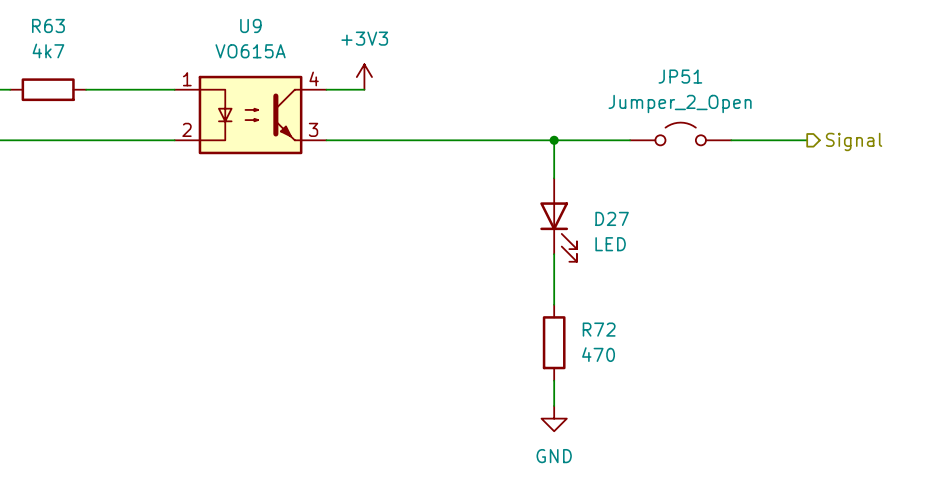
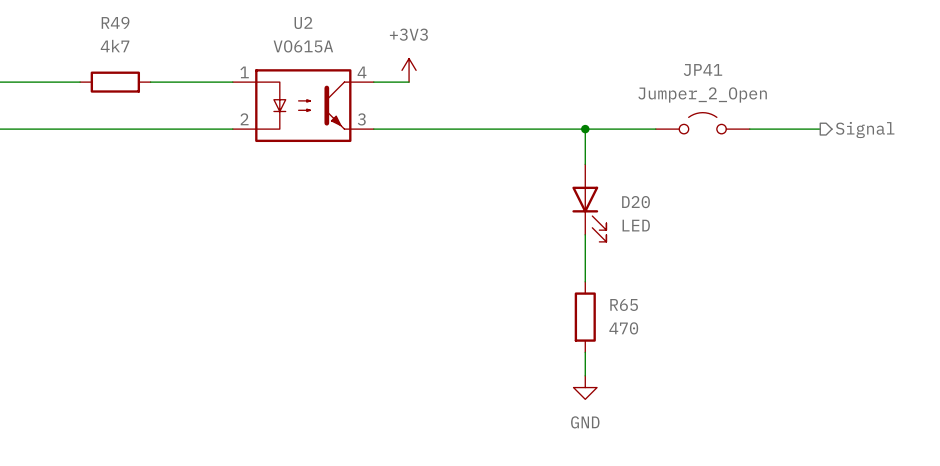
R63 name: R63 (48, 25) -> R49 (115, 22)
U9 name: U9 (250, 25) -> U2 (303, 22)
JP51 name: JP51 (680, 76) -> JP41 (702, 70)
D27 name: D27 (612, 218) -> D20 (636, 202)
R72 name: R72 (599, 329) -> R65 (624, 304)

